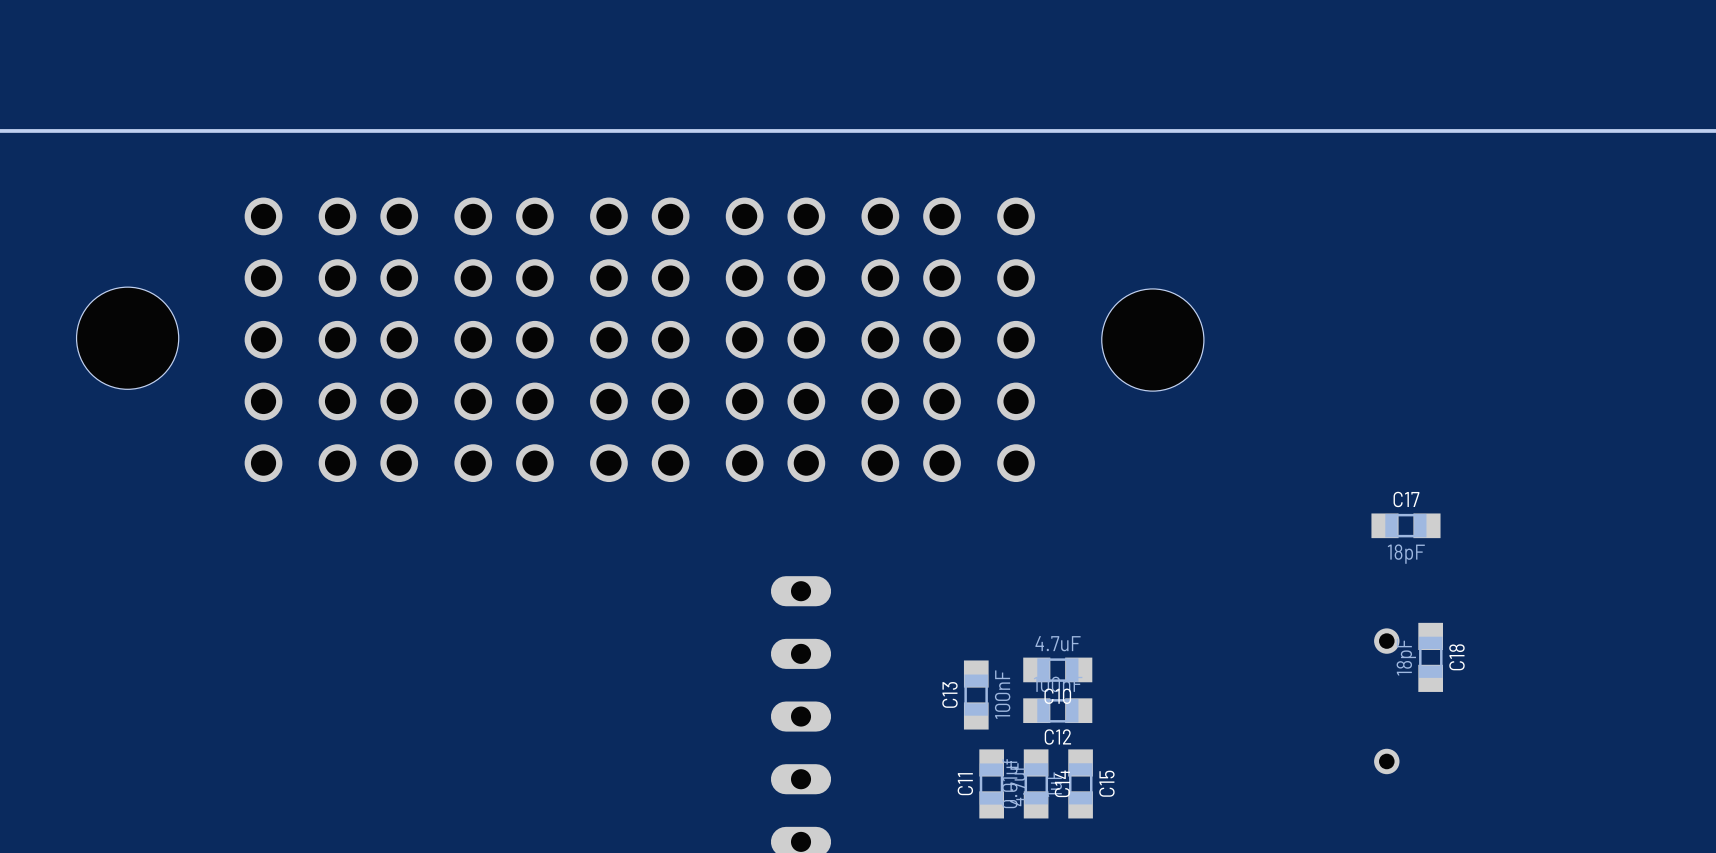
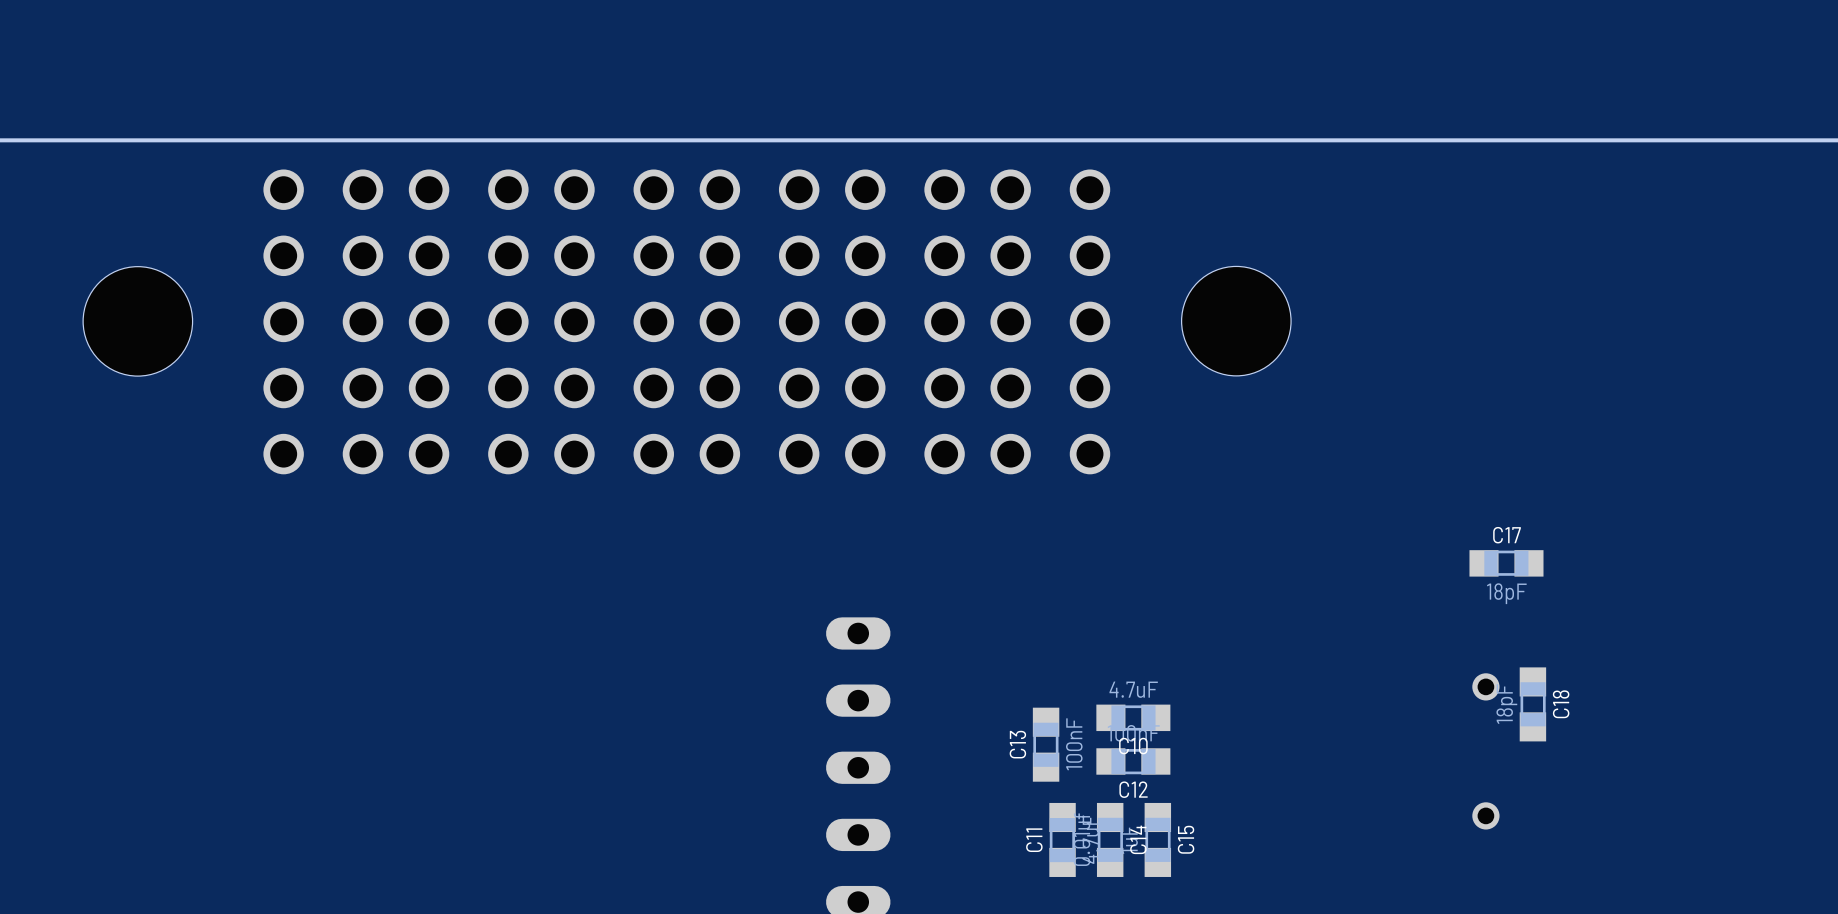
hole position: (127, 338) -> (137, 321)
part position: (639, 339) -> (686, 321)
hole position: (1152, 340) -> (1236, 321)

